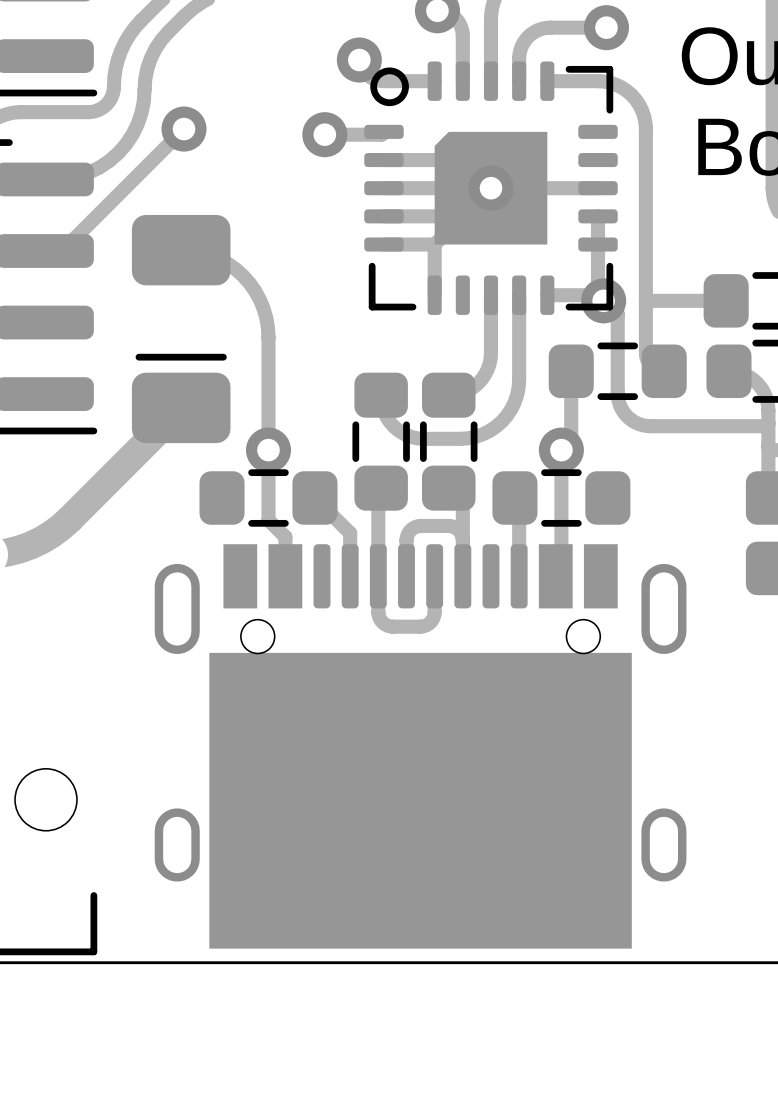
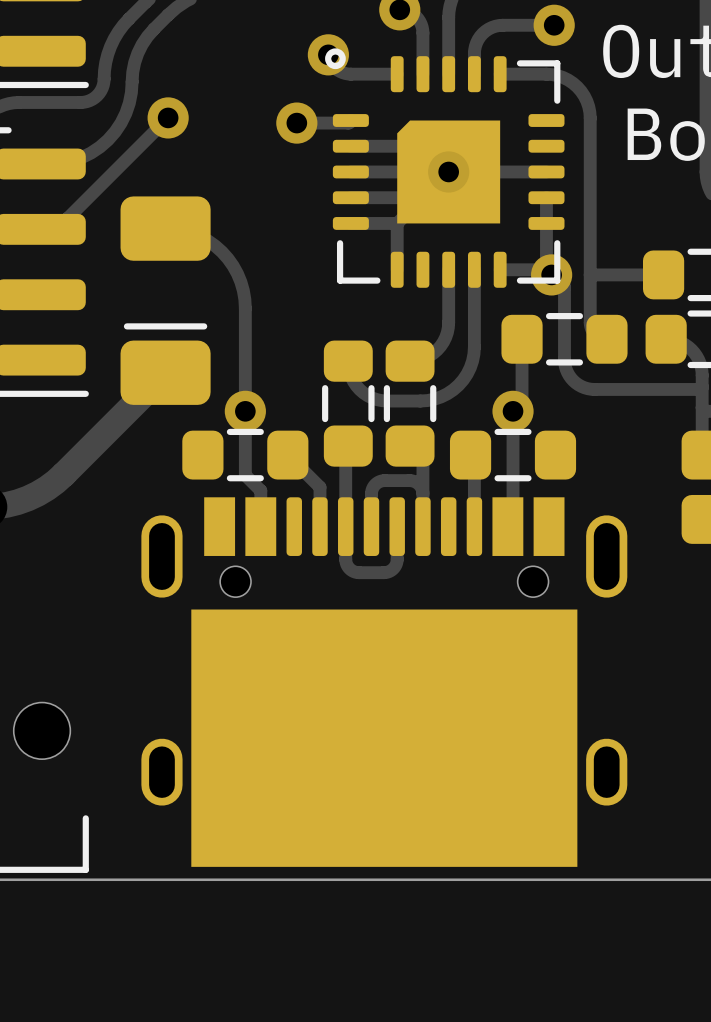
part footprint: [364, 61, 618, 315] -> [325, 48, 565, 288]
part footprint: [154, 544, 687, 949] -> [141, 497, 628, 867]

